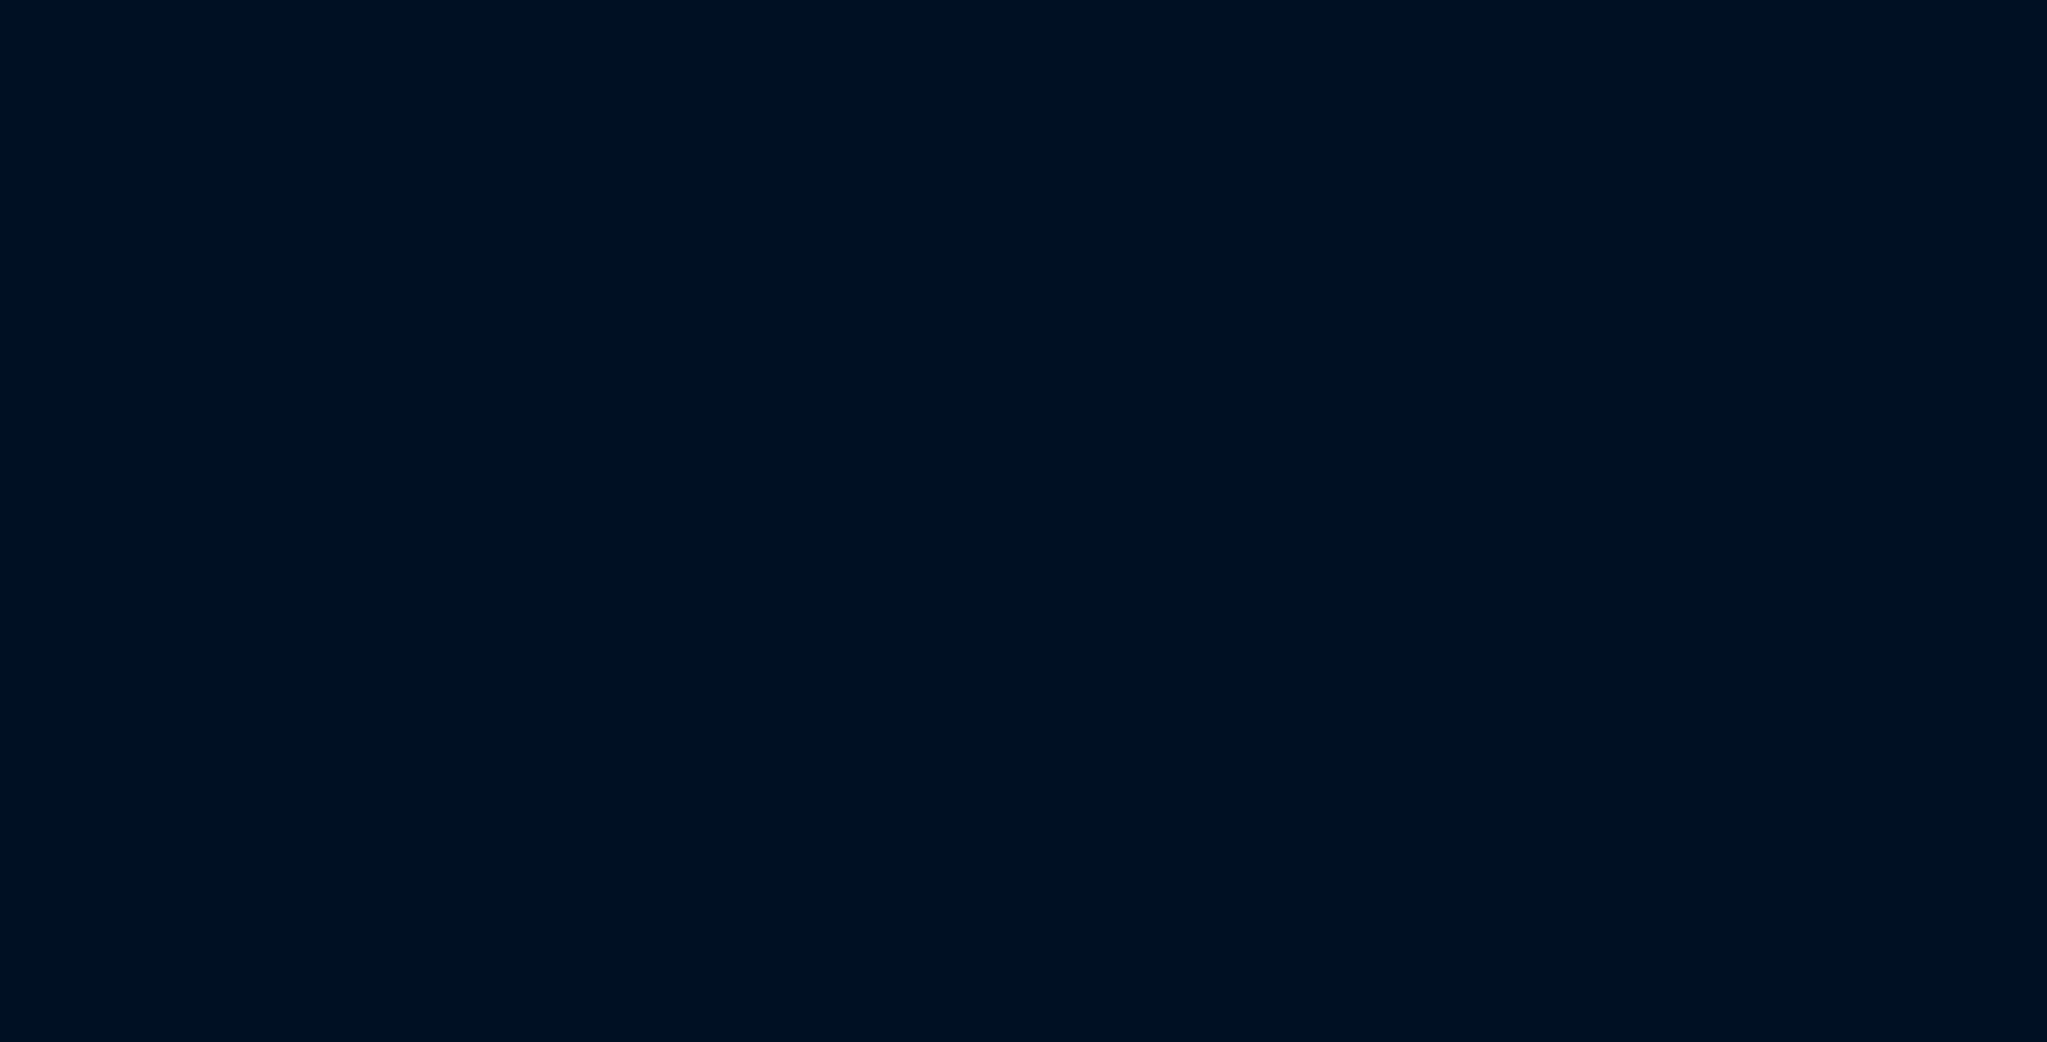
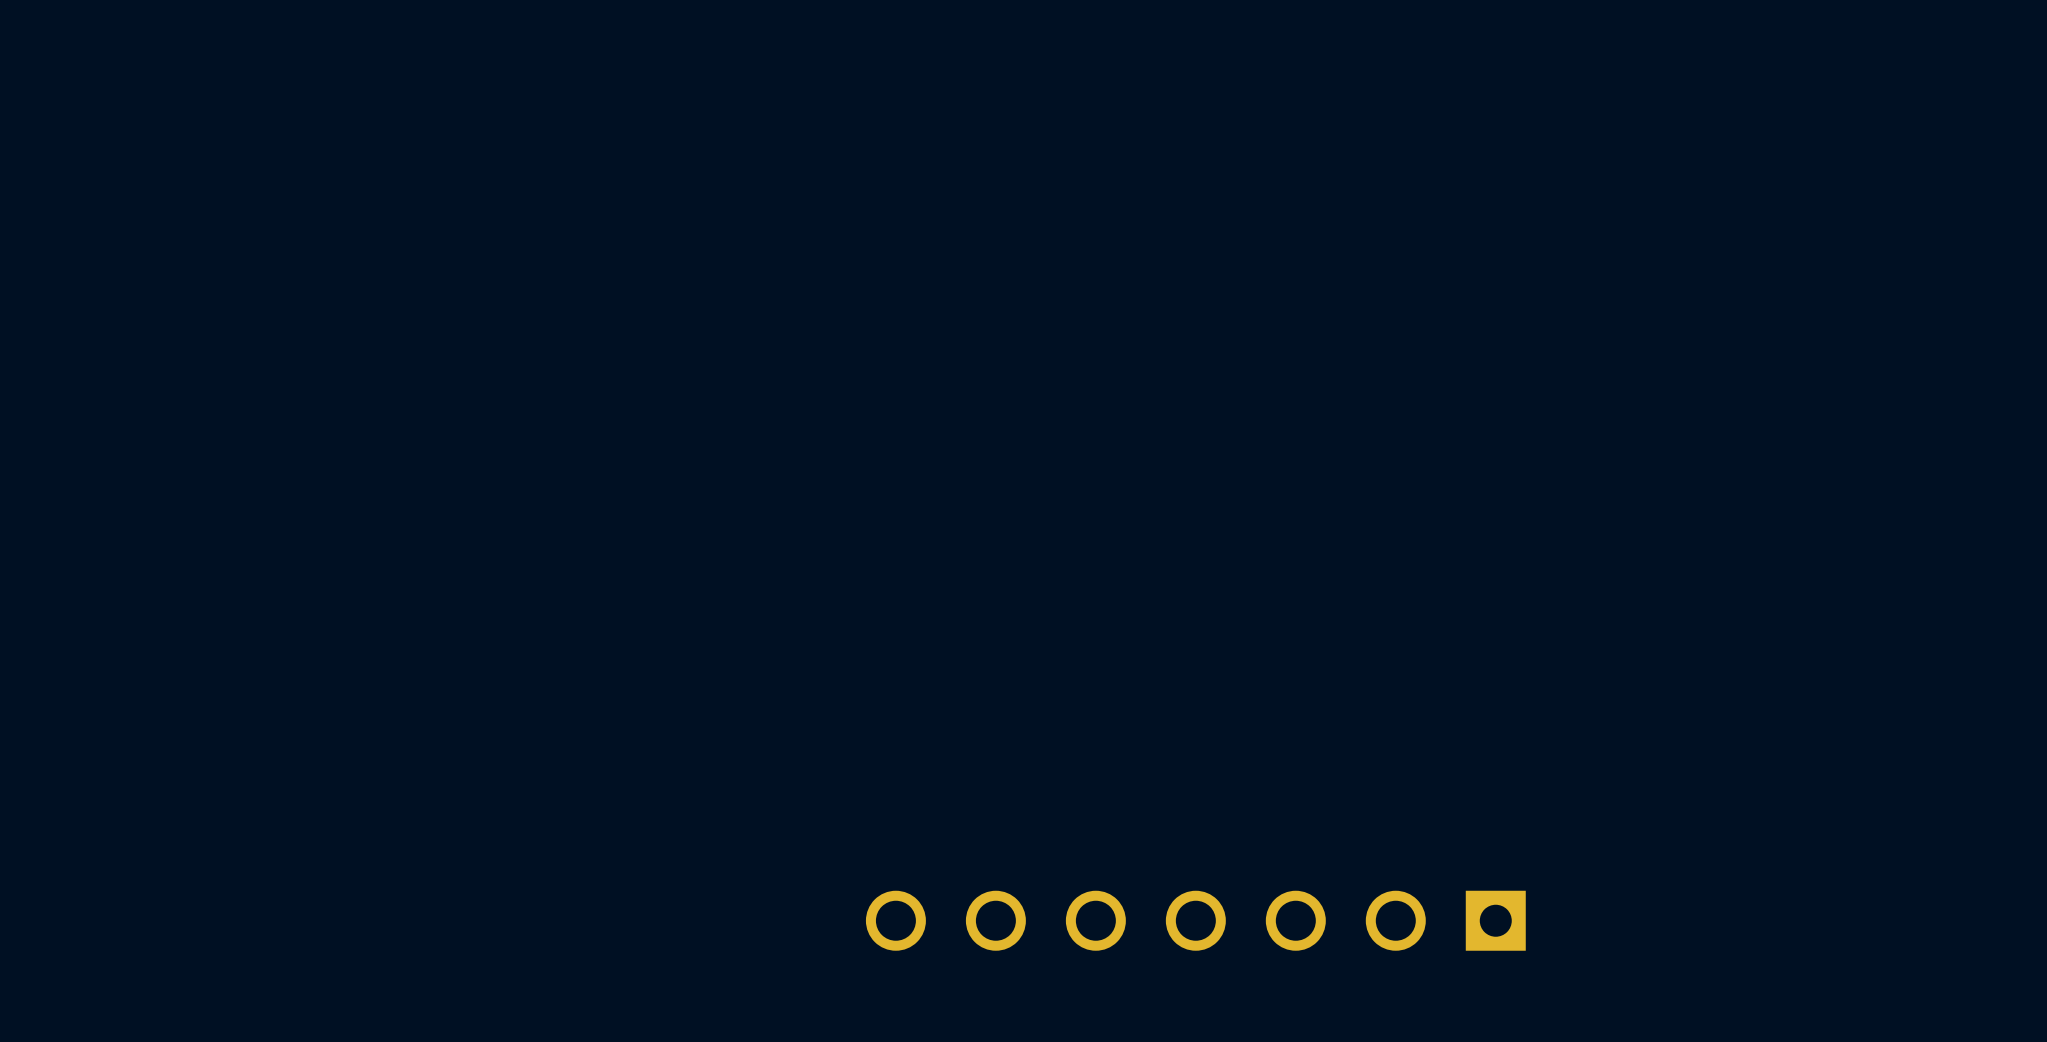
part: none -> (1195, 920)

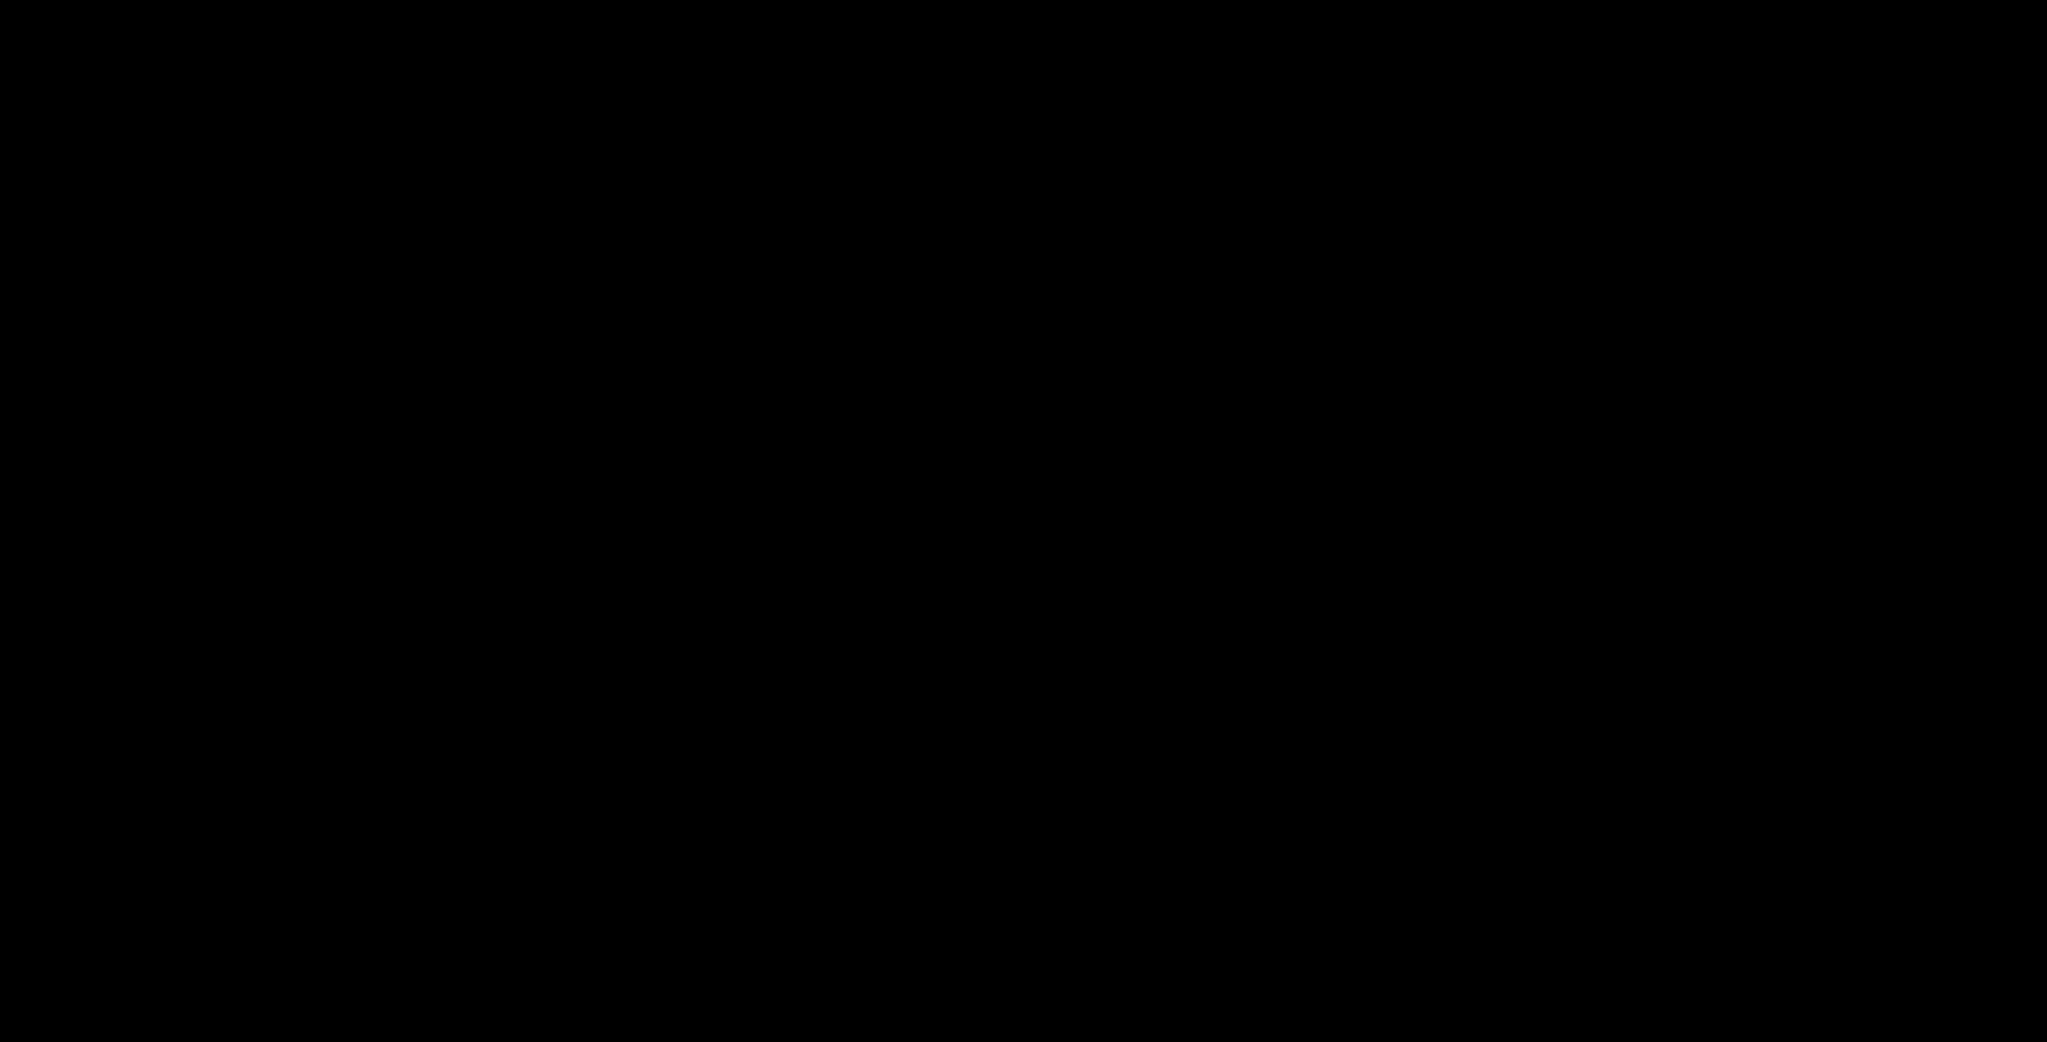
part: (1195, 920) -> none

